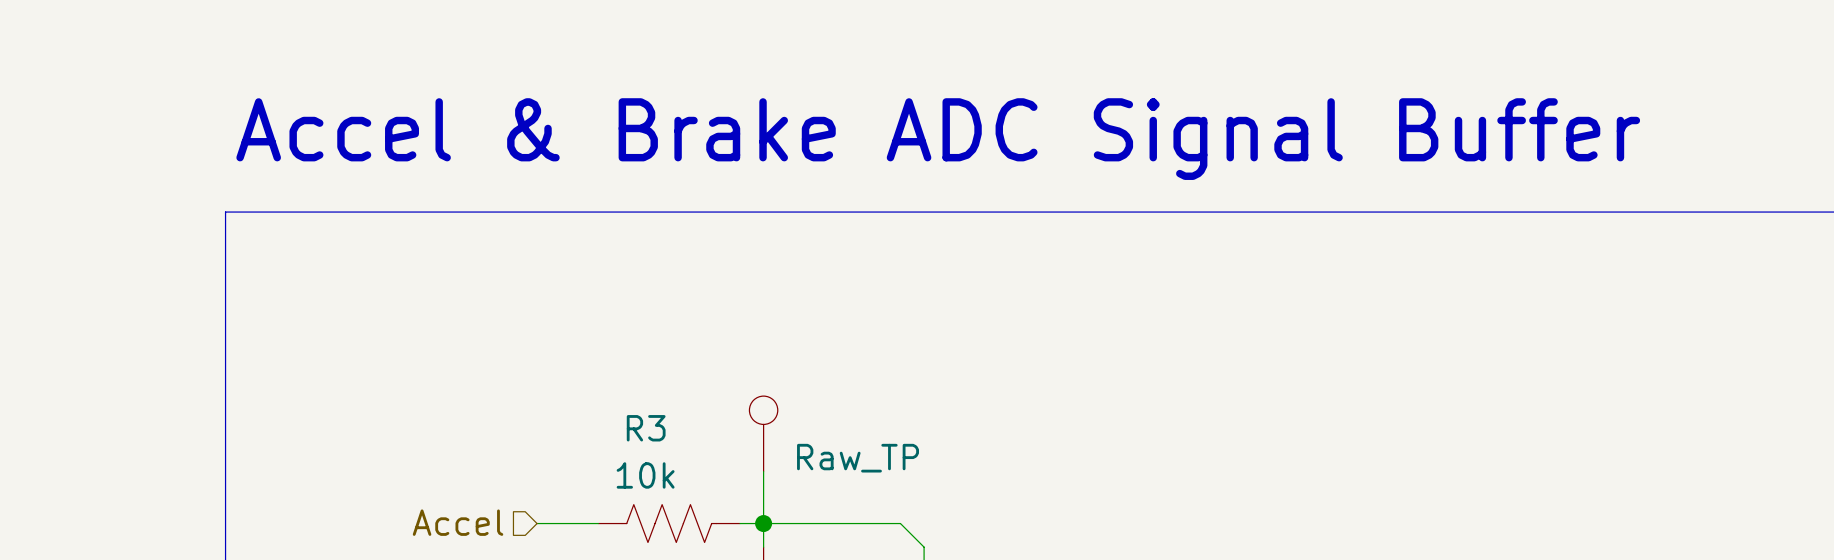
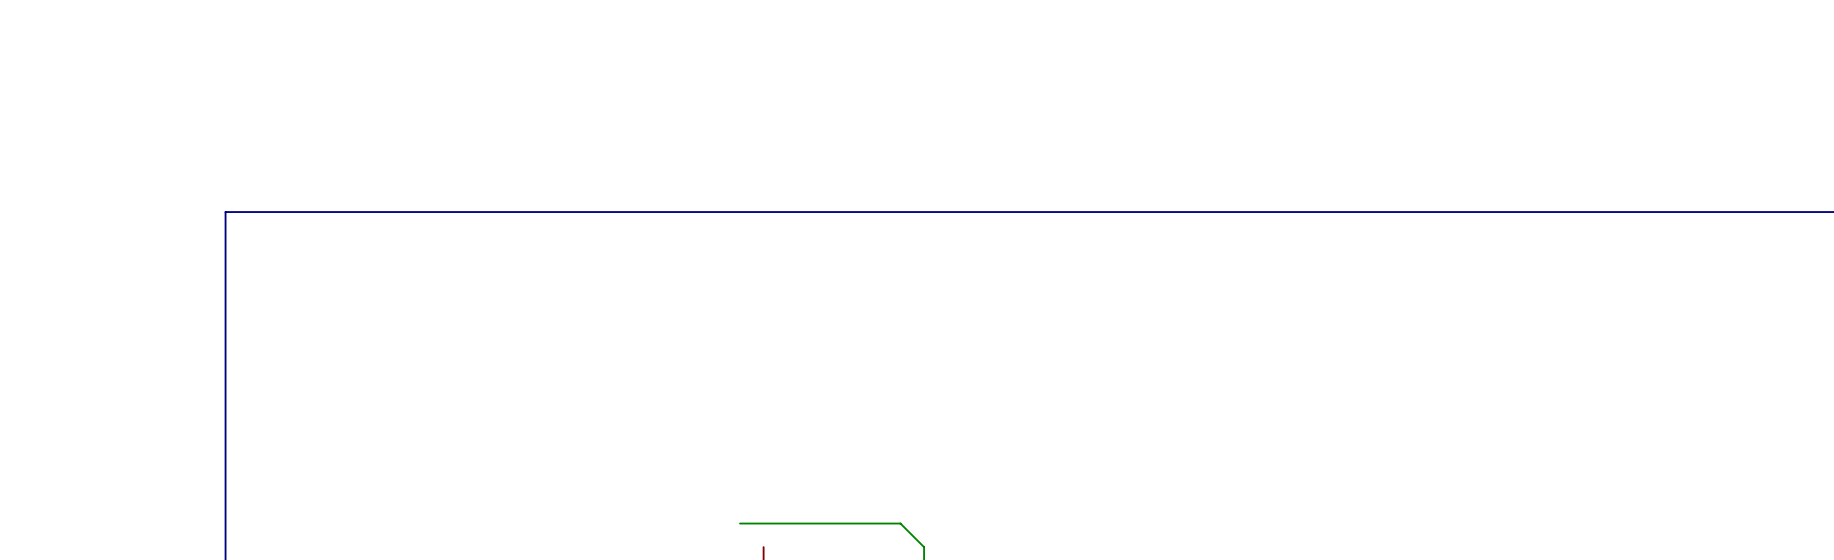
text: Accel & Brake ADC Signal Buffer (938, 139) -> none
part: Raw_TP (763, 433) -> none
wire: (763, 471) (763, 547) -> none
hierarchical label: Accel (458, 522) -> none
wire: (537, 523) (598, 523) -> none
R3: 10k (669, 523) -> none
junction: (763, 523) -> none

